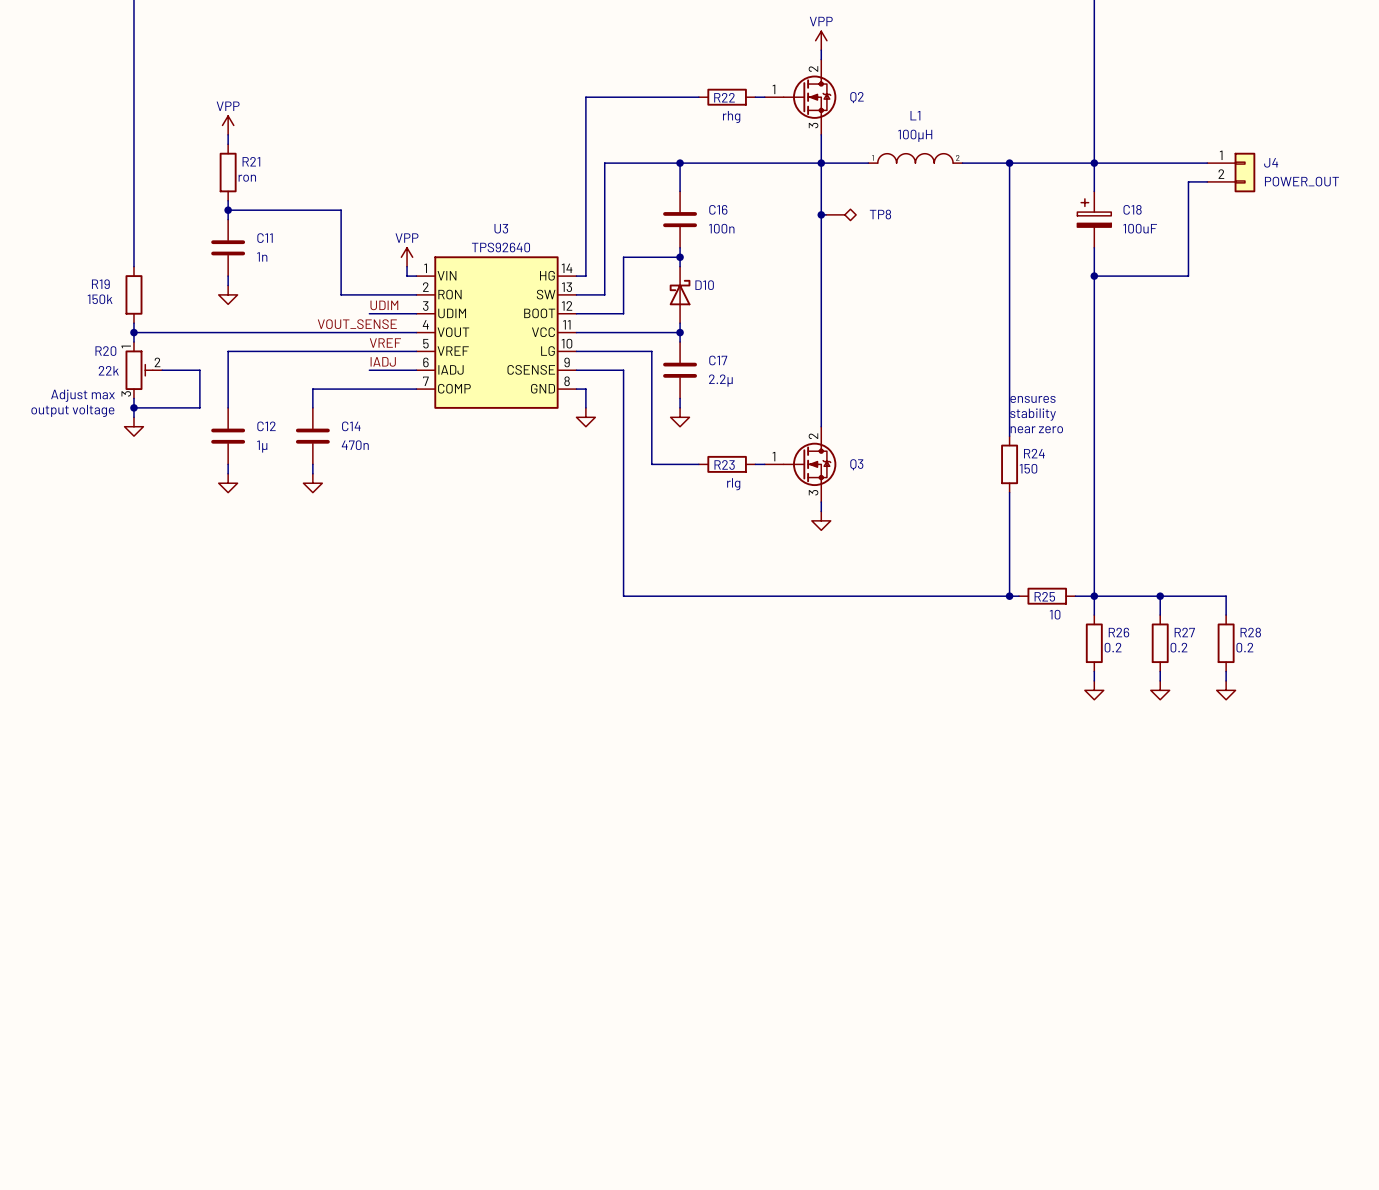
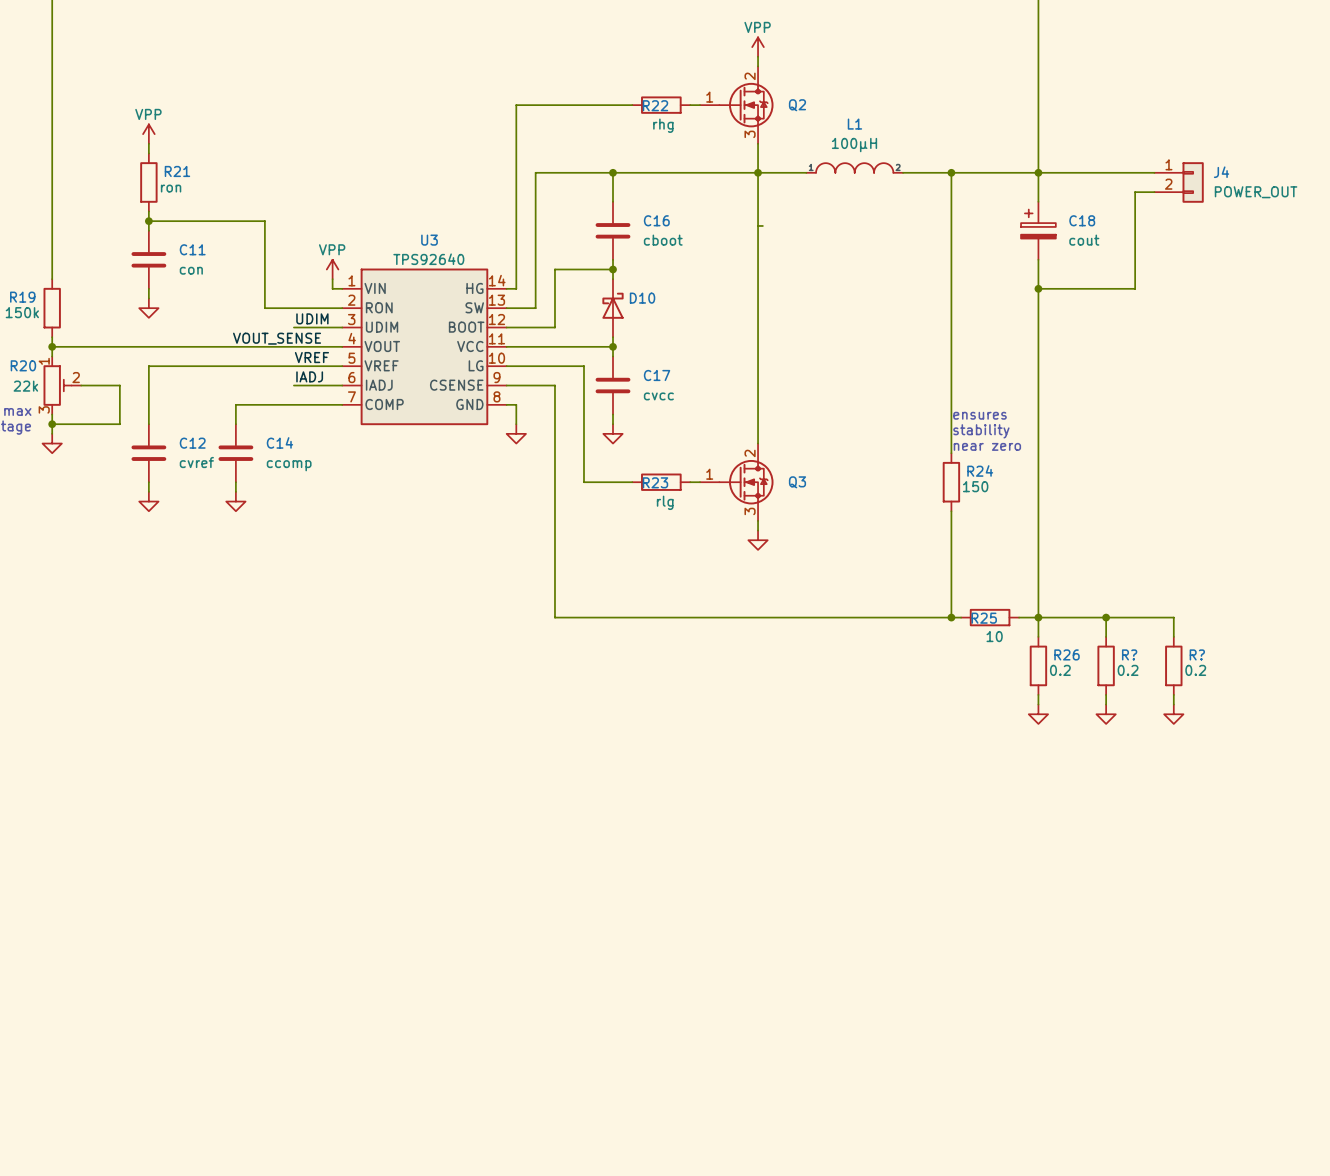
junction: (821, 214) -> none
TP8: (841, 214) -> none
C16 value: 100n (721, 228) -> cboot (663, 240)
C18 value: 100uF (1140, 228) -> cout (1084, 240)
C11 value: 1n (262, 256) -> con (191, 270)
C17 value: 2.2µ (720, 380) -> cvcc (658, 396)
C14 value: 470n (355, 445) -> ccomp (289, 465)
C12 value: 1µ (262, 446) -> cvref (196, 462)
R27 name: R27 (1184, 632) -> R? (1129, 654)
R28 name: R28 (1250, 632) -> R? (1197, 654)

